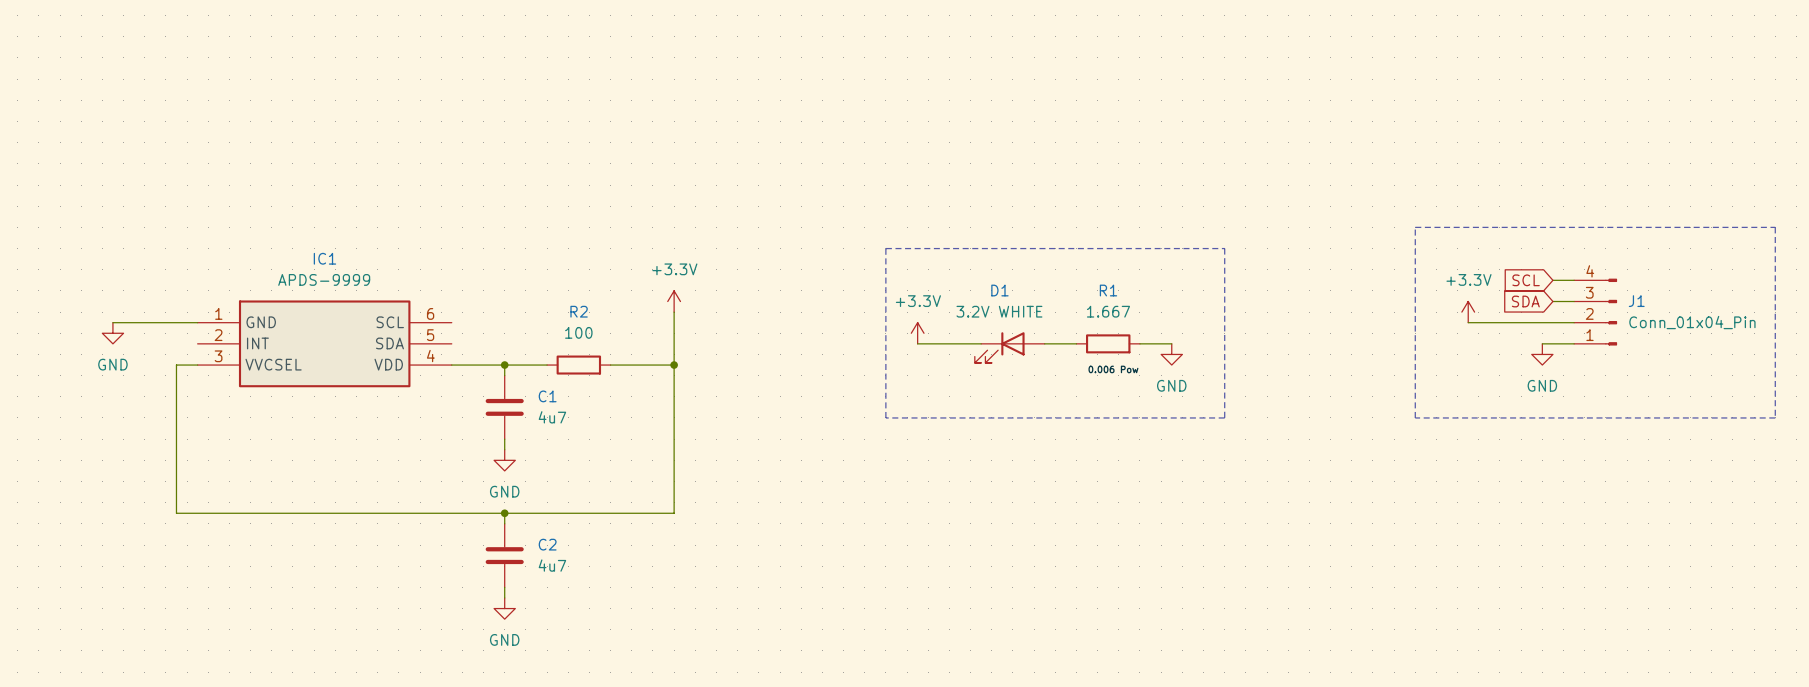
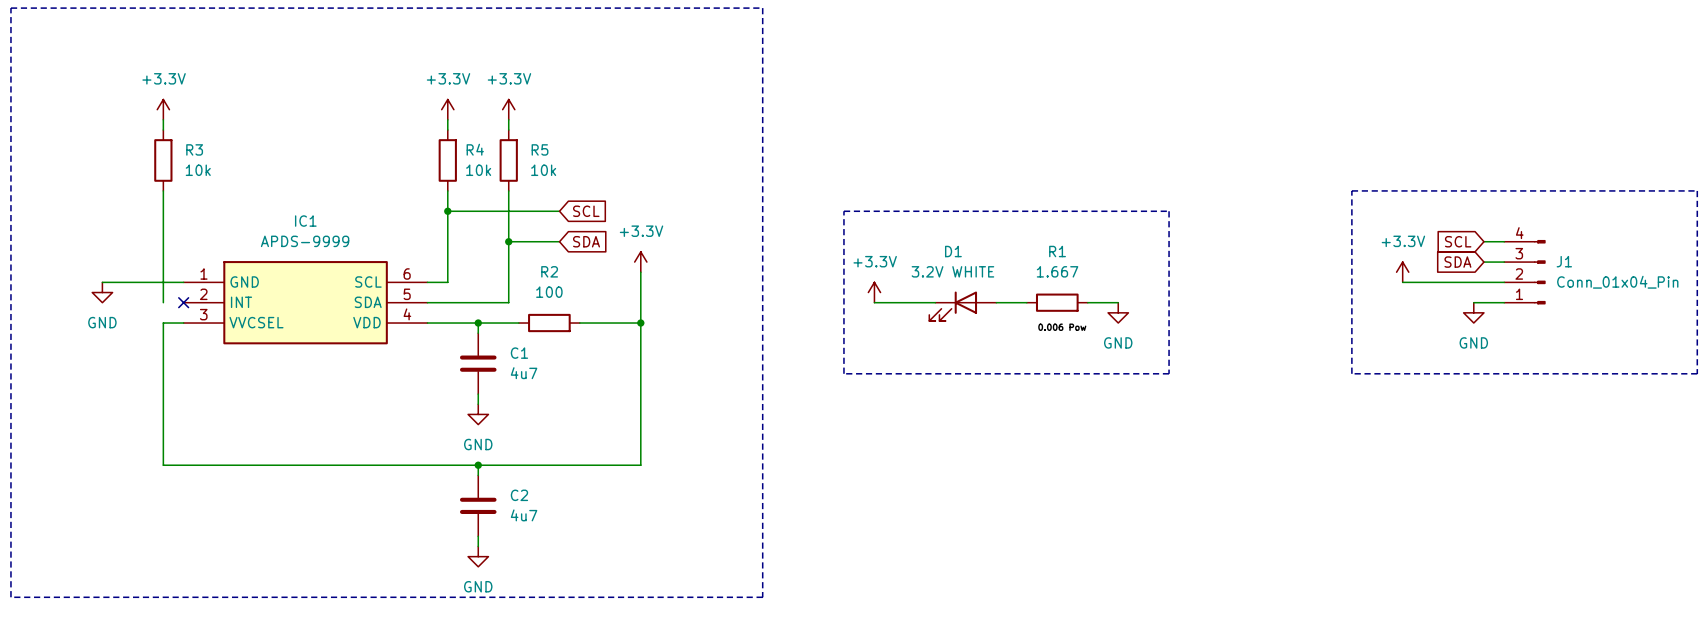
line: none -> (10, 8) (762, 8) (762, 597) (10, 597) (10, 8)
power symbol: none -> +3.3V (163, 109)
power symbol: none -> +3.3V (447, 109)
power symbol: none -> +3.3V (508, 109)
wire: none -> (163, 119) (163, 130)
wire: none -> (447, 119) (447, 130)
wire: none -> (508, 119) (508, 130)
R3: none -> 10k (163, 160)
R4: none -> 10k (447, 160)
R5: none -> 10k (508, 160)
wire: none -> (163, 190) (163, 302)
wire: none -> (447, 190) (447, 282) (427, 282)
wire: none -> (508, 190) (508, 302) (427, 302)
wire: none -> (447, 211) (559, 211)
junction: none -> (447, 211)
global label: none -> SCL (586, 211)
wire: none -> (508, 241) (559, 241)
junction: none -> (508, 241)
global label: none -> SDA (586, 241)
no-connect mark: none -> (183, 302)

